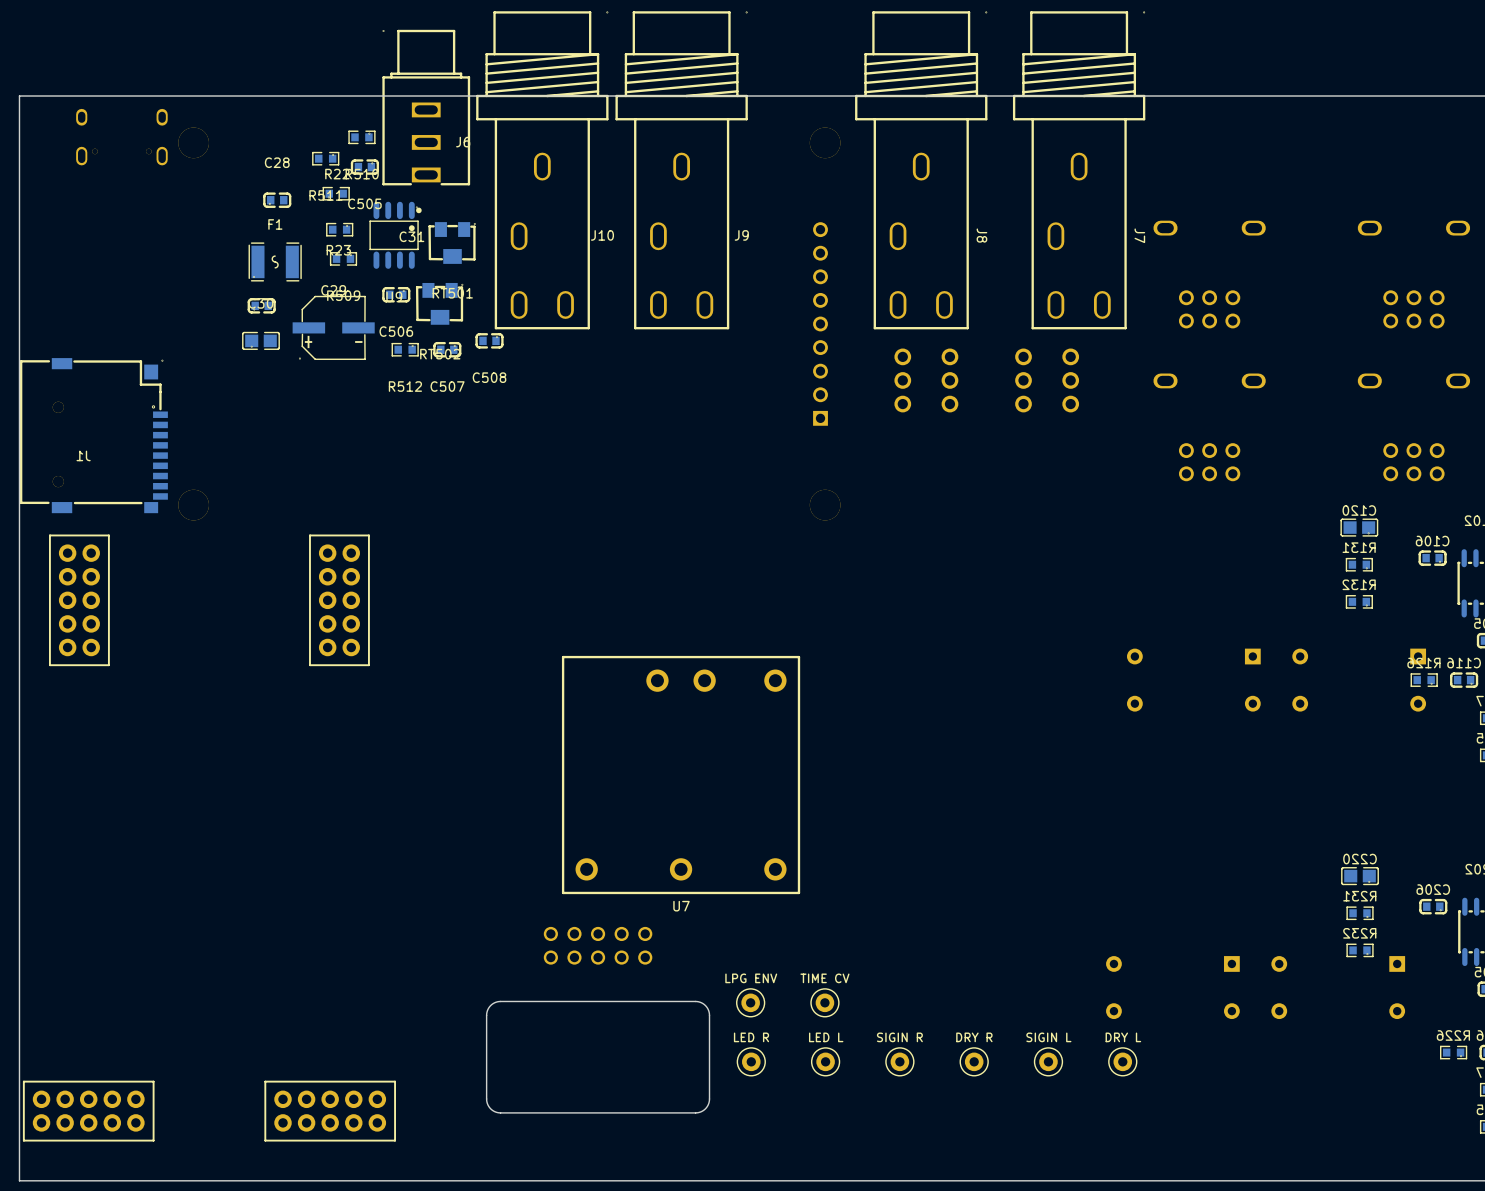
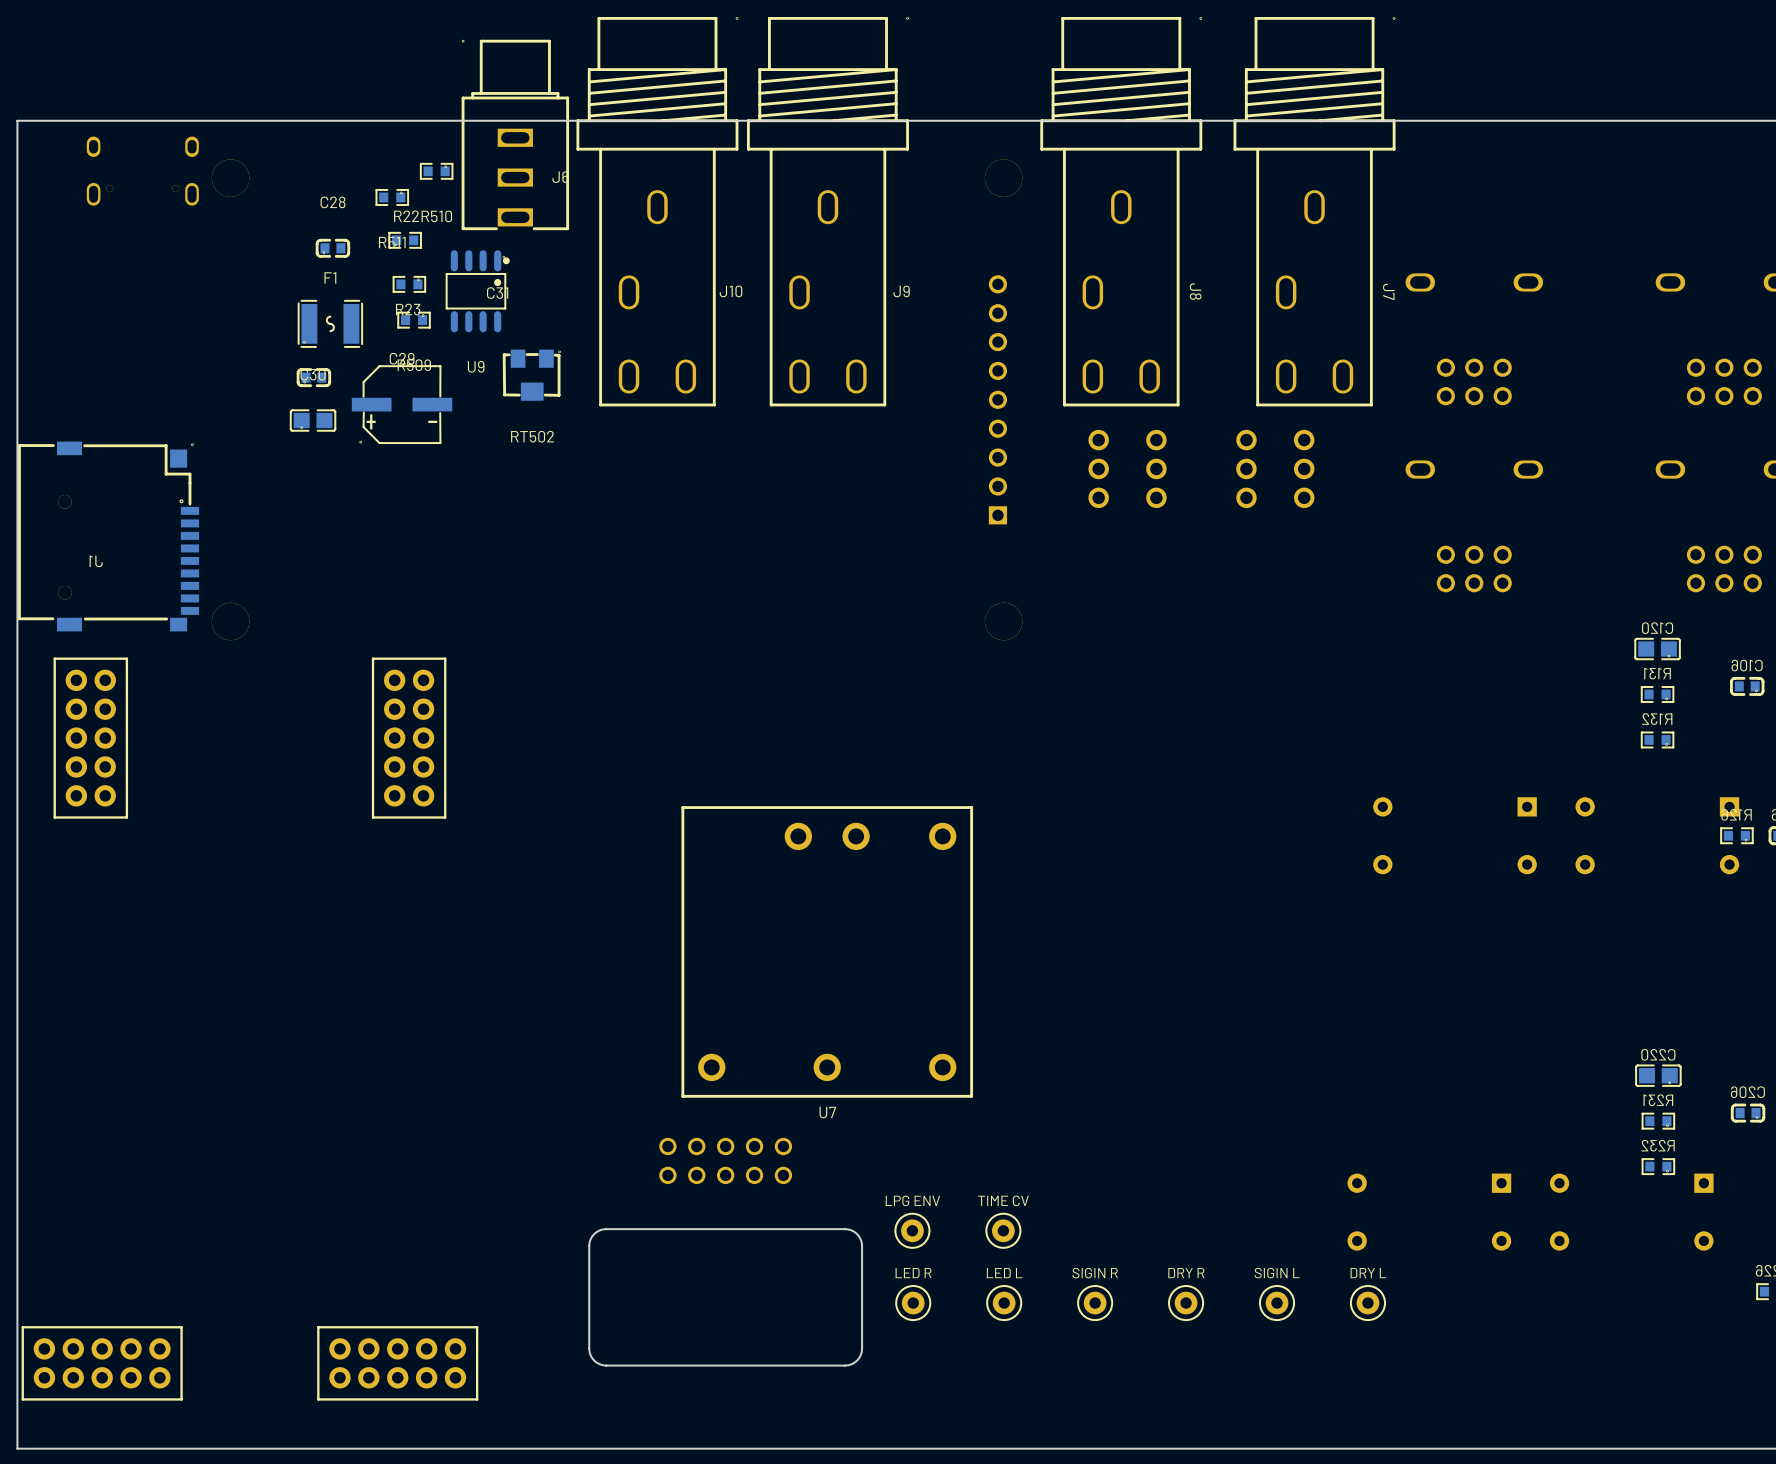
C505: (364, 167) -> none
RT501: (452, 242) -> none
C506: (396, 294) -> none
C508: (489, 340) -> none
R512: (405, 349) -> none
C507: (447, 349) -> none

